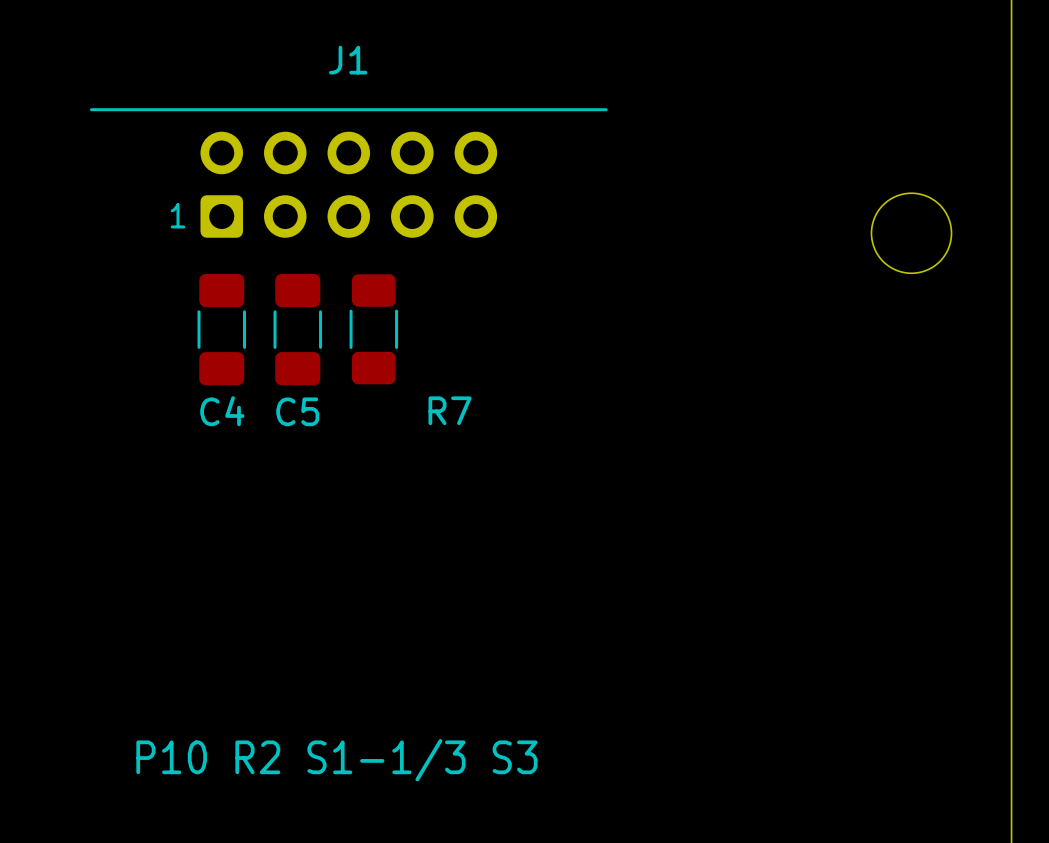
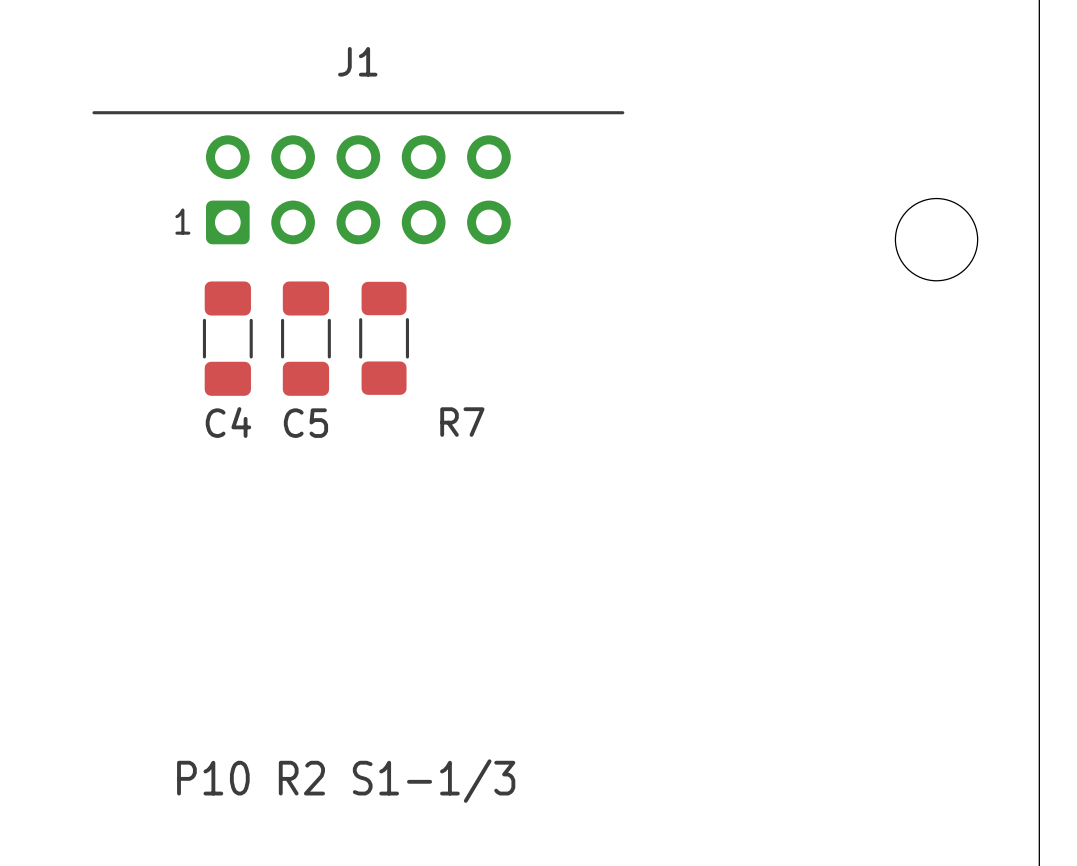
text: P10 R2 S1-1/3 S3 (336, 760) -> P10 R2 S1-1/3 (346, 781)

